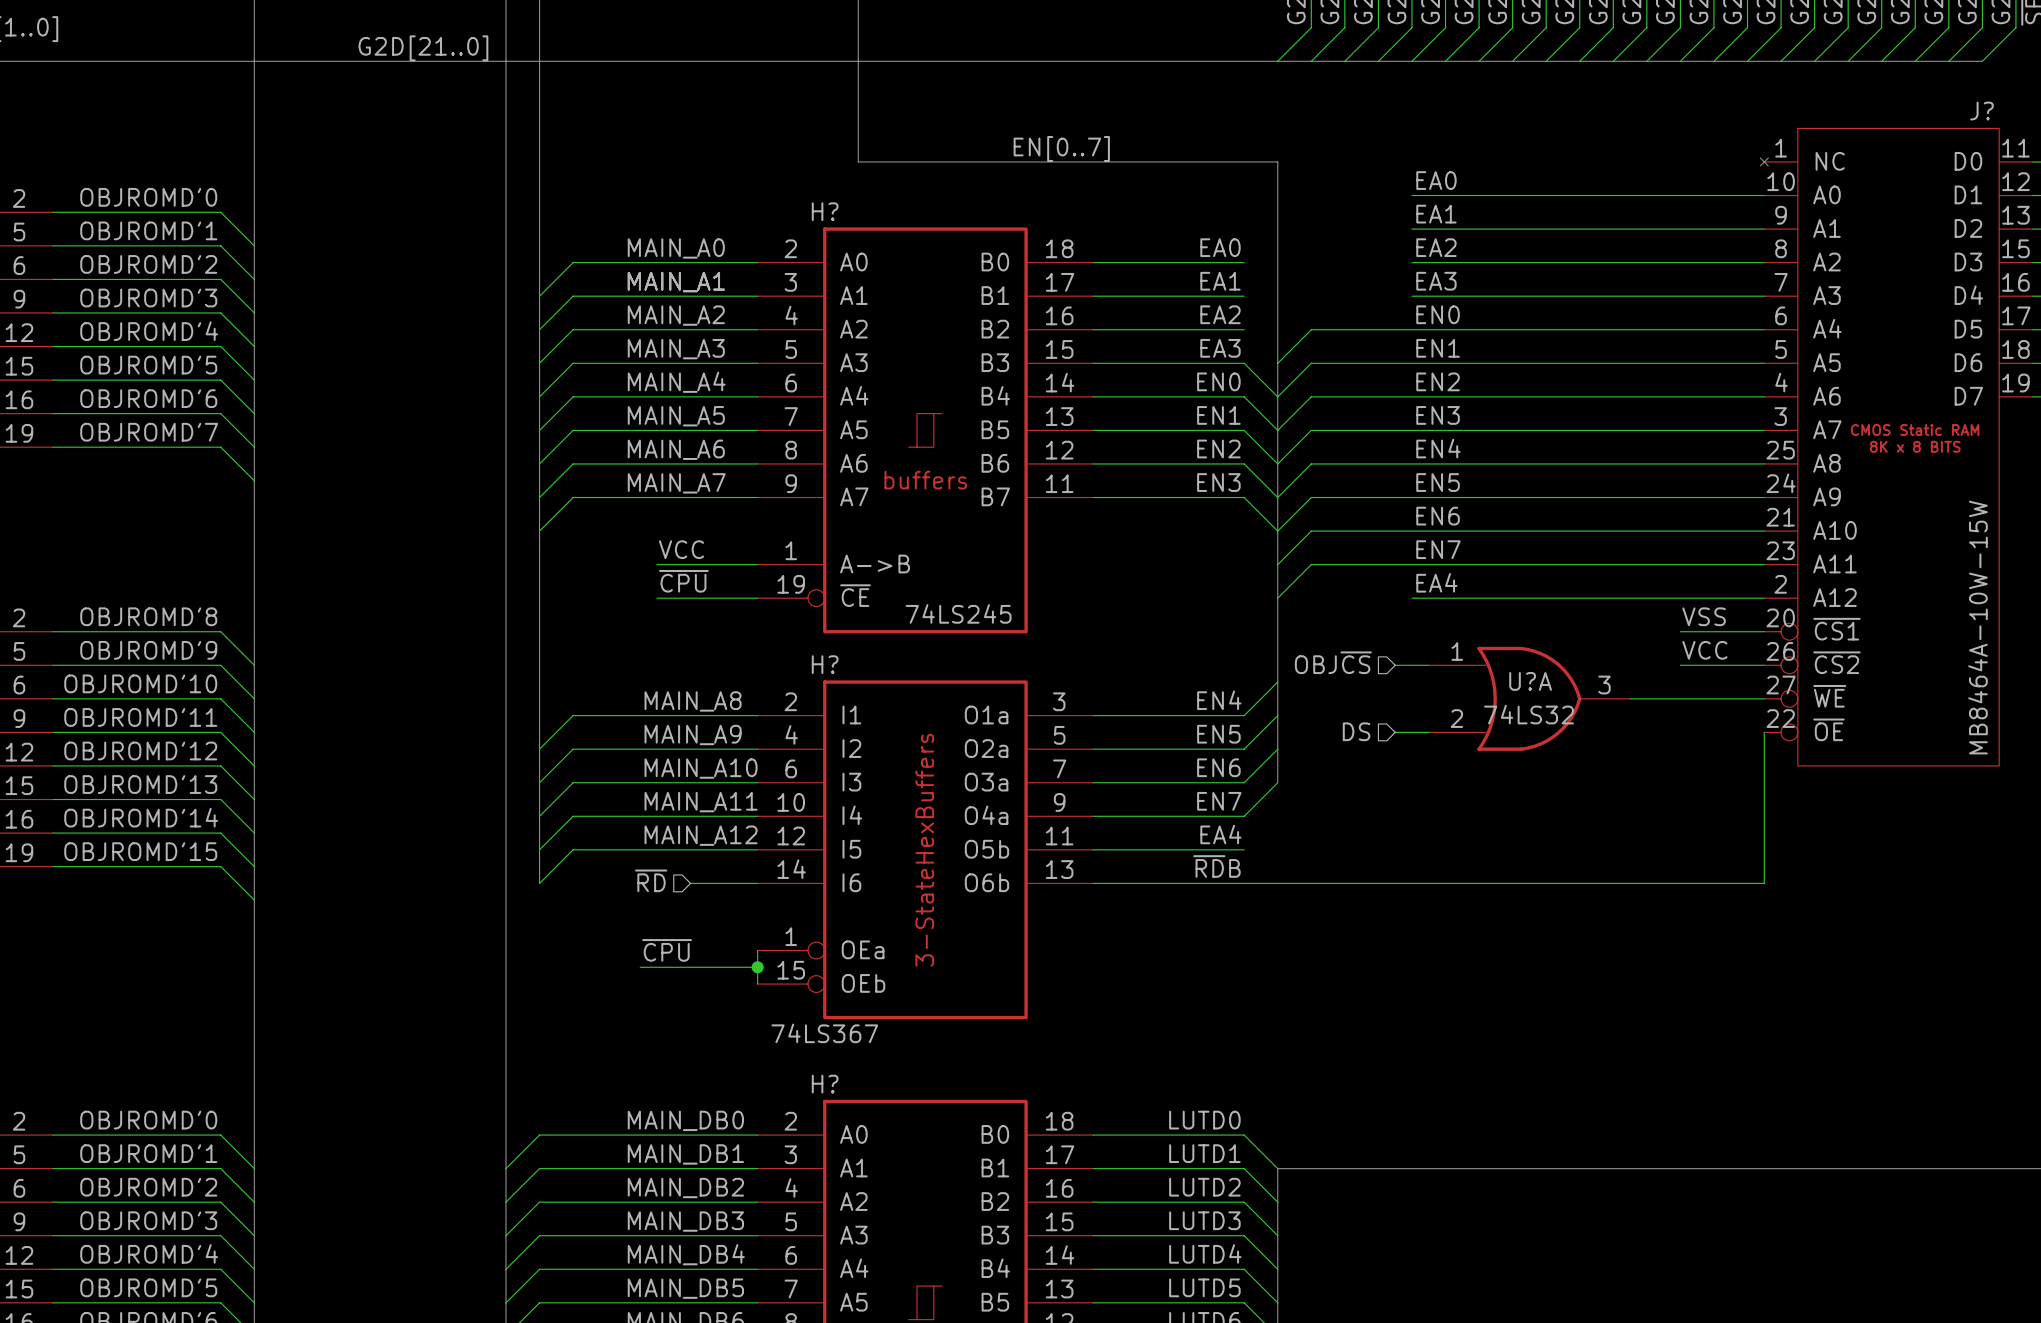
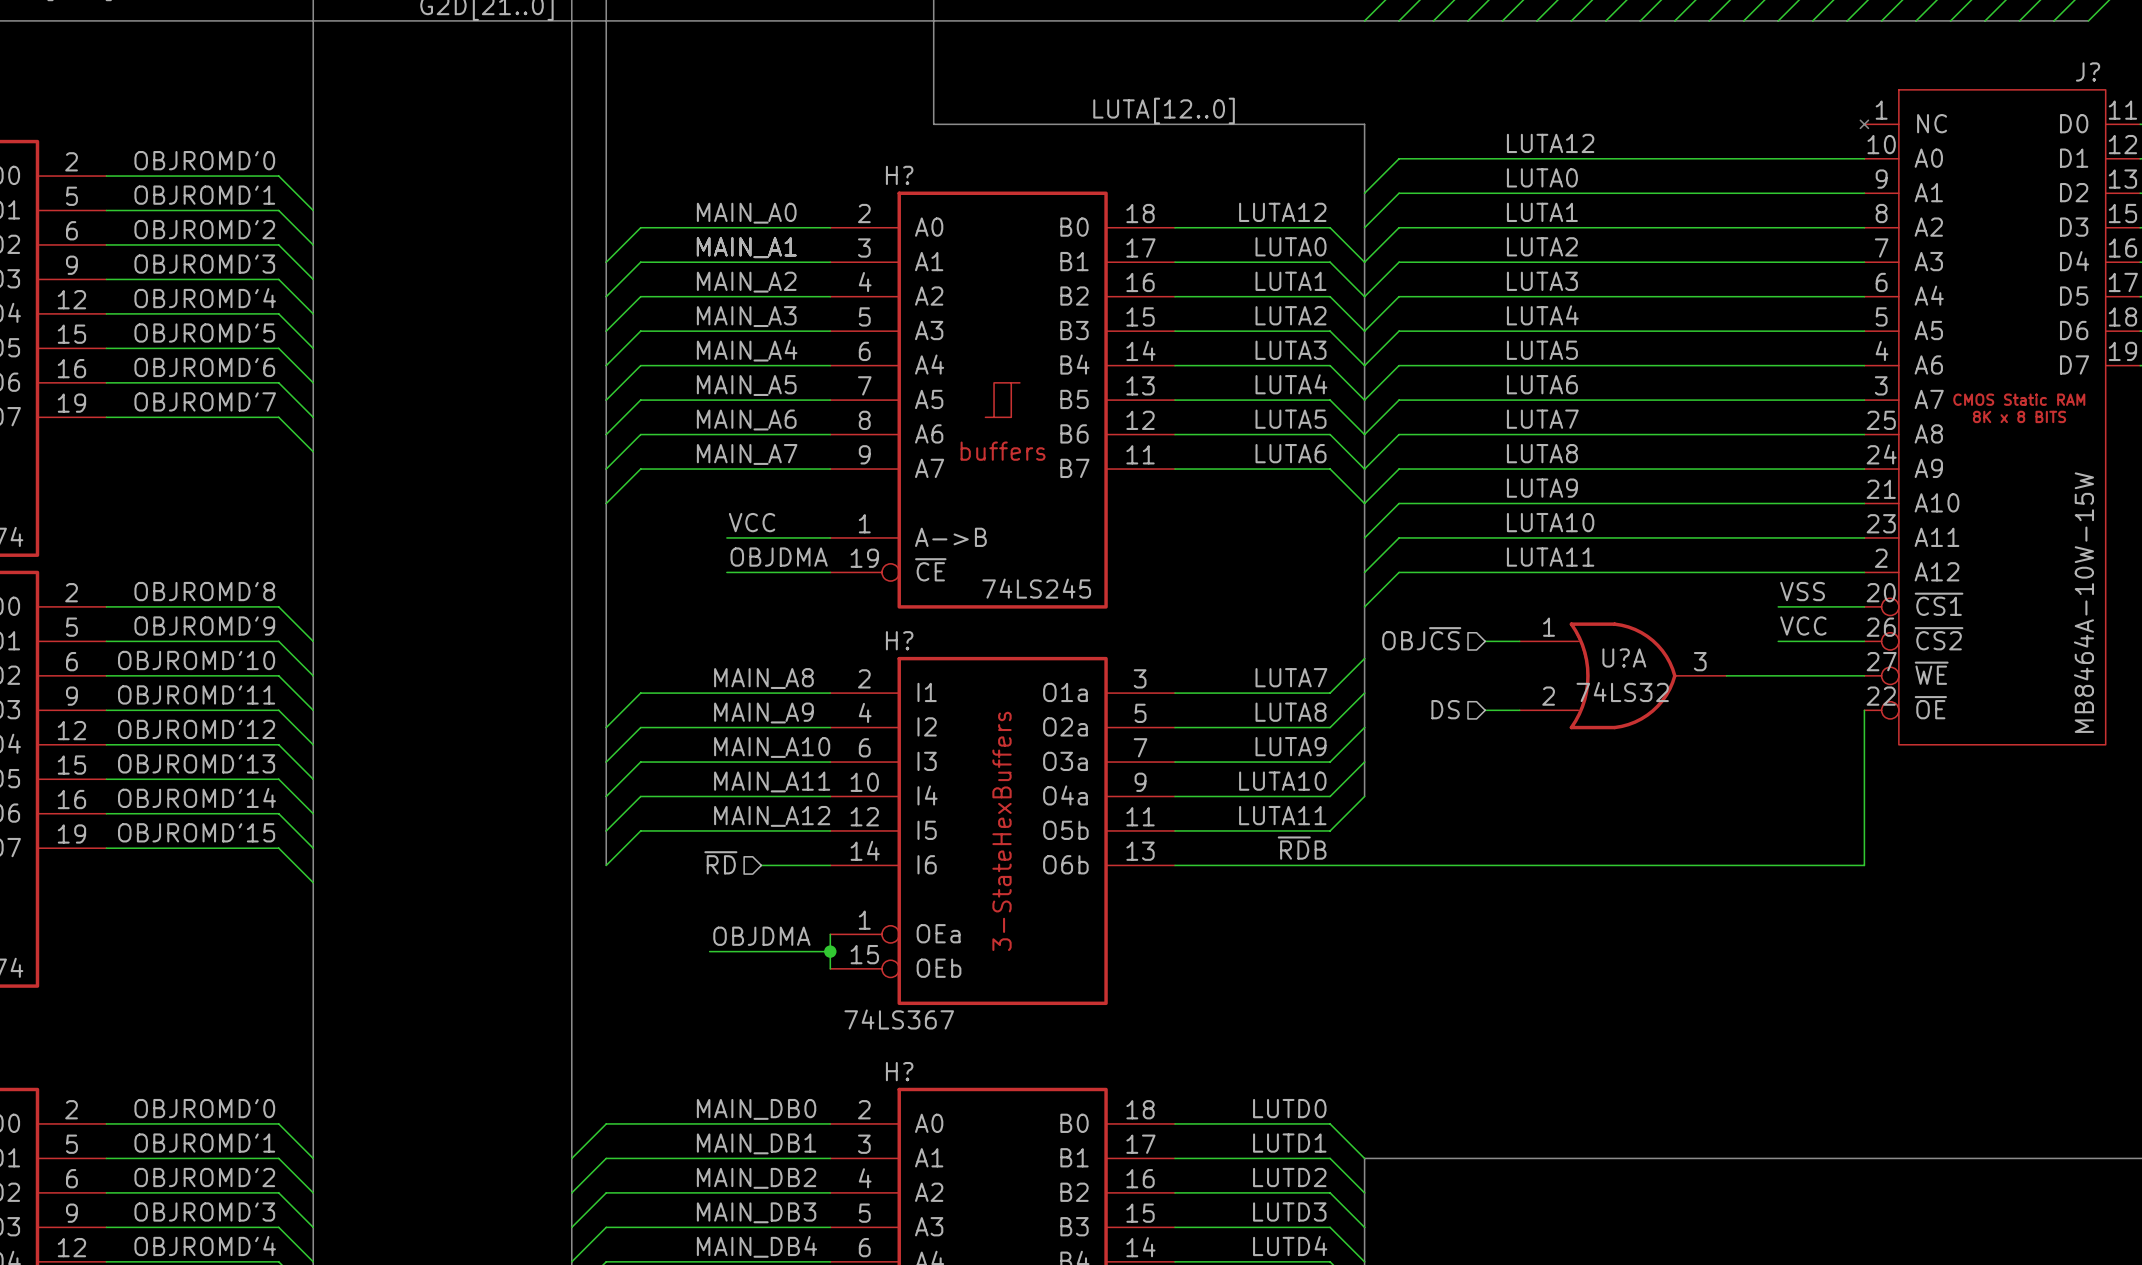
label: EN[0..7] (1061, 149) -> LUTA[12..0] (1164, 111)
label: EA0 (1436, 180) -> LUTA12 (1550, 143)
wire: none -> (1502, 158) (1399, 158) (1364, 193)
label: EA1 (1436, 214) -> LUTA0 (1542, 177)
wire: none -> (1502, 193) (1399, 193) (1364, 227)
label: EA0 (1220, 247) -> LUTA12 (1282, 212)
label: EA2 (1436, 247) -> LUTA1 (1542, 212)
wire: none -> (1330, 227) (1364, 262) (1399, 227) (1502, 227)
label: EA1 (1220, 281) -> LUTA0 (1291, 246)
label: EA3 (1436, 281) -> LUTA2 (1542, 246)
wire: none -> (1330, 262) (1364, 296) (1399, 262) (1502, 262)
label: EA2 (1220, 314) -> LUTA1 (1291, 281)
label: EN0 (1438, 314) -> LUTA3 (1542, 281)
wire: none -> (1330, 296) (1364, 331)
label: EA3 (1220, 348) -> LUTA2 (1291, 315)
label: EN1 (1438, 348) -> LUTA4 (1542, 315)
label: EN0 (1218, 381) -> LUTA3 (1291, 350)
label: EN2 (1438, 381) -> LUTA5 (1542, 350)
label: EN1 (1218, 415) -> LUTA4 (1291, 384)
label: EN3 (1438, 415) -> LUTA6 (1542, 384)
label: EN2 (1218, 448) -> LUTA5 (1291, 419)
label: EN4 (1438, 448) -> LUTA7 (1542, 419)
label: EN3 (1218, 482) -> LUTA6 (1291, 453)
label: EN5 (1438, 482) -> LUTA8 (1542, 453)
label: EN6 (1438, 516) -> LUTA9 (1542, 488)
label: EN7 (1438, 549) -> LUTA10 (1550, 522)
label: ~{CPU} (683, 581) -> OBJDMA (779, 557)
label: EA4 (1436, 582) -> LUTA11 (1550, 557)
wire: none -> (1502, 572) (1399, 572) (1364, 606)
label: EN4 (1219, 700) -> LUTA7 (1291, 677)
label: EN5 (1218, 734) -> LUTA8 (1291, 712)
label: EN6 (1218, 767) -> LUTA9 (1291, 746)
bus: none -> (1364, 762) (1364, 796)
label: EN7 (1219, 801) -> LUTA10 (1282, 781)
wire: none -> (1364, 796) (1330, 830)
label: EA4 (1220, 834) -> LUTA11 (1282, 815)
label: ~{CPU} (667, 950) -> OBJDMA (761, 936)

